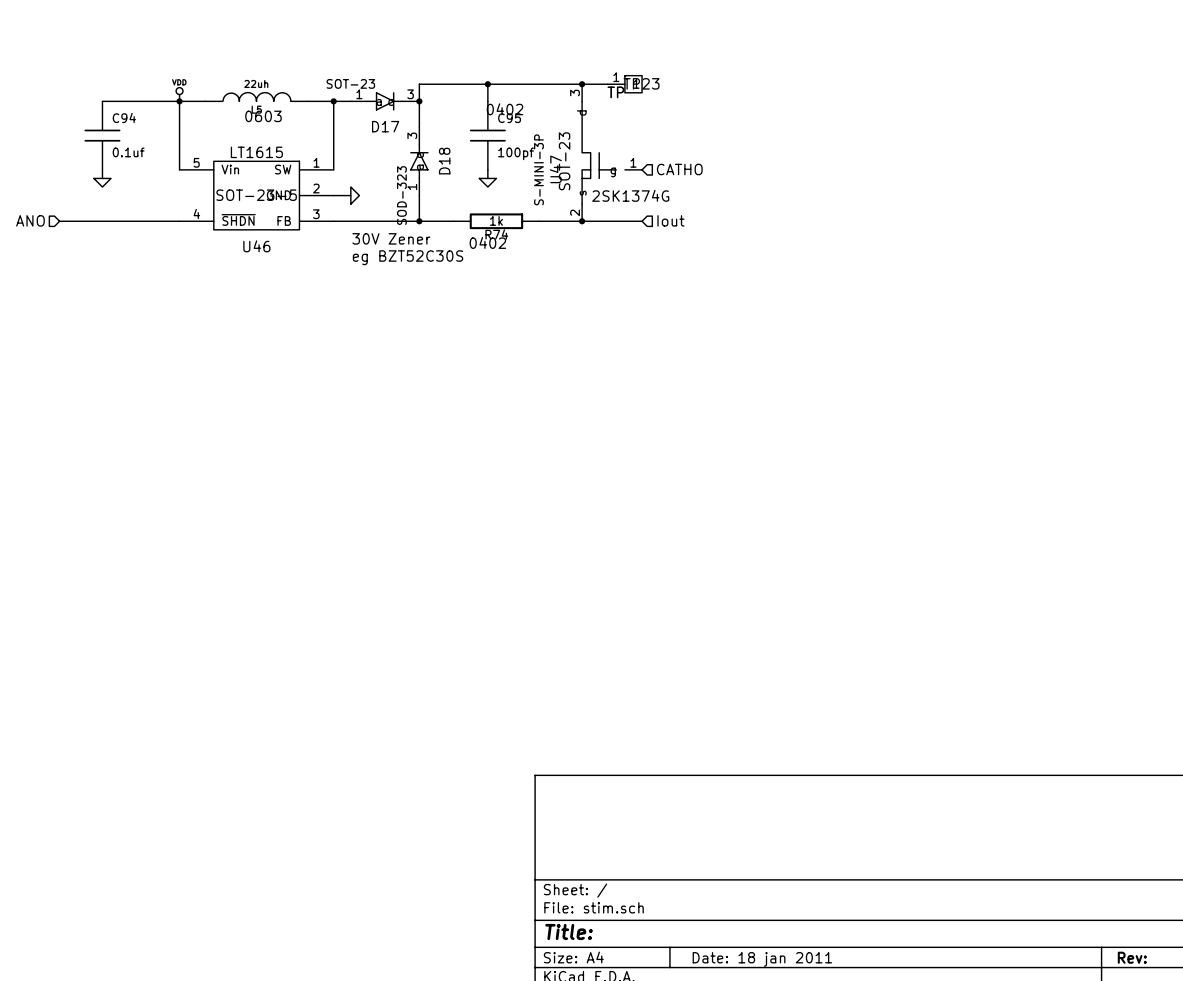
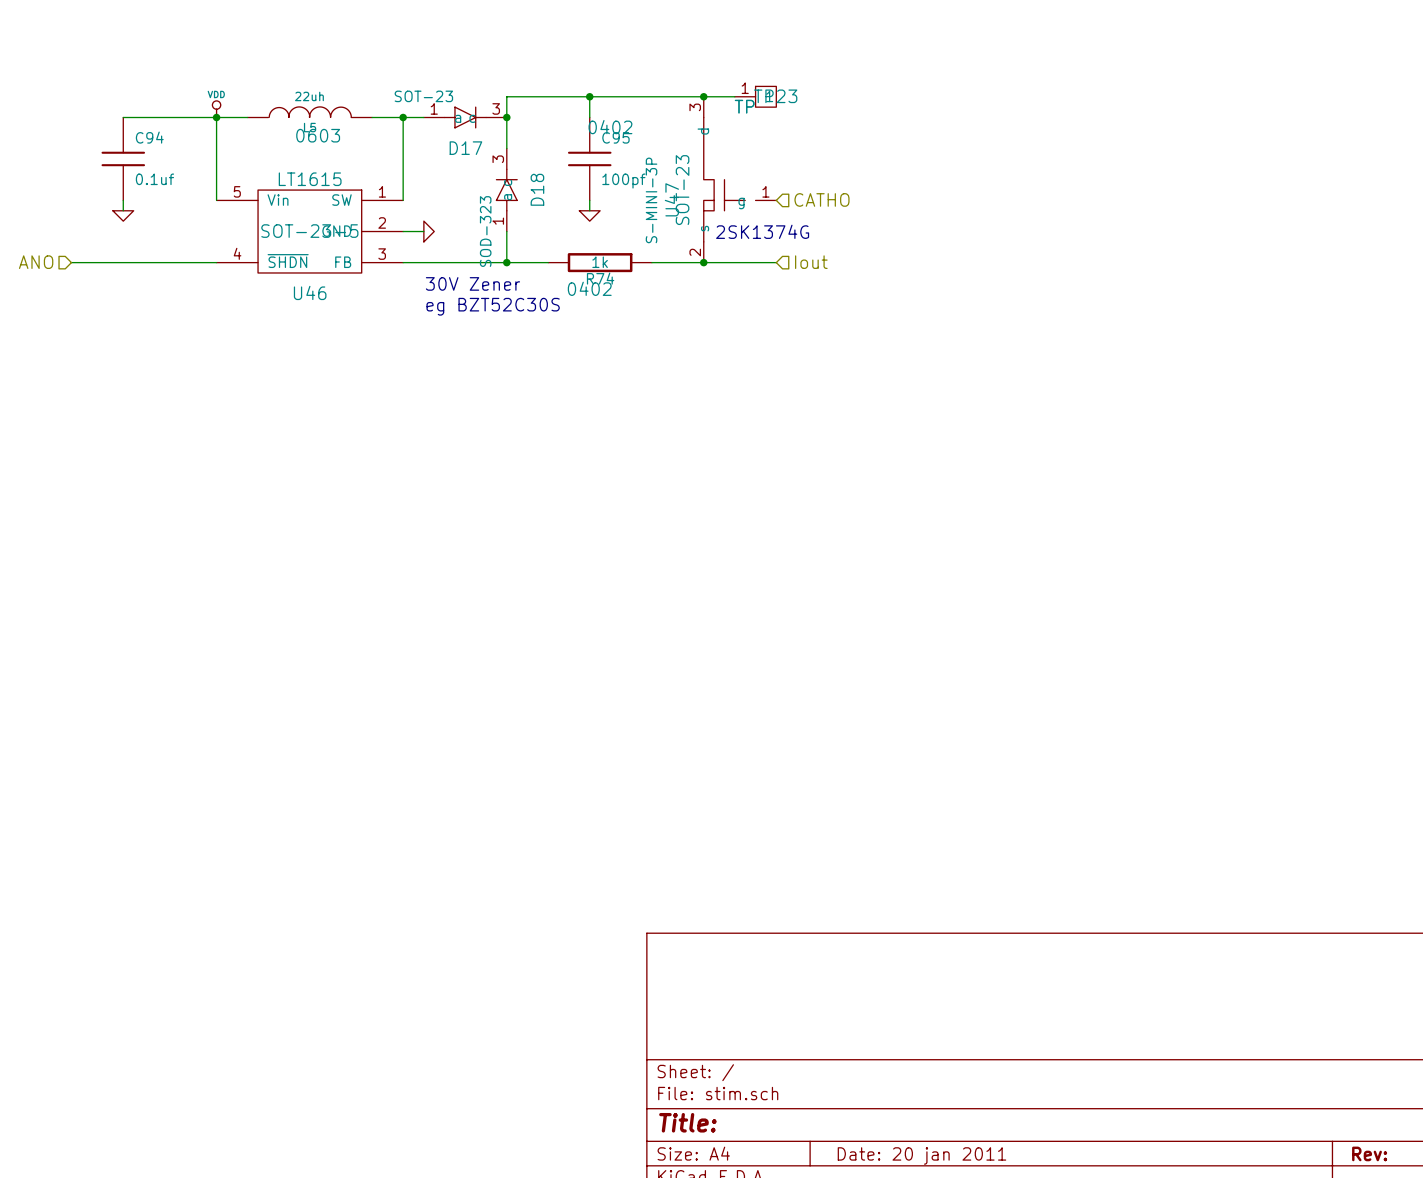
title block: Date: 18 jan 2011 (762, 959) -> Date: 20 jan 2011 (921, 1155)

